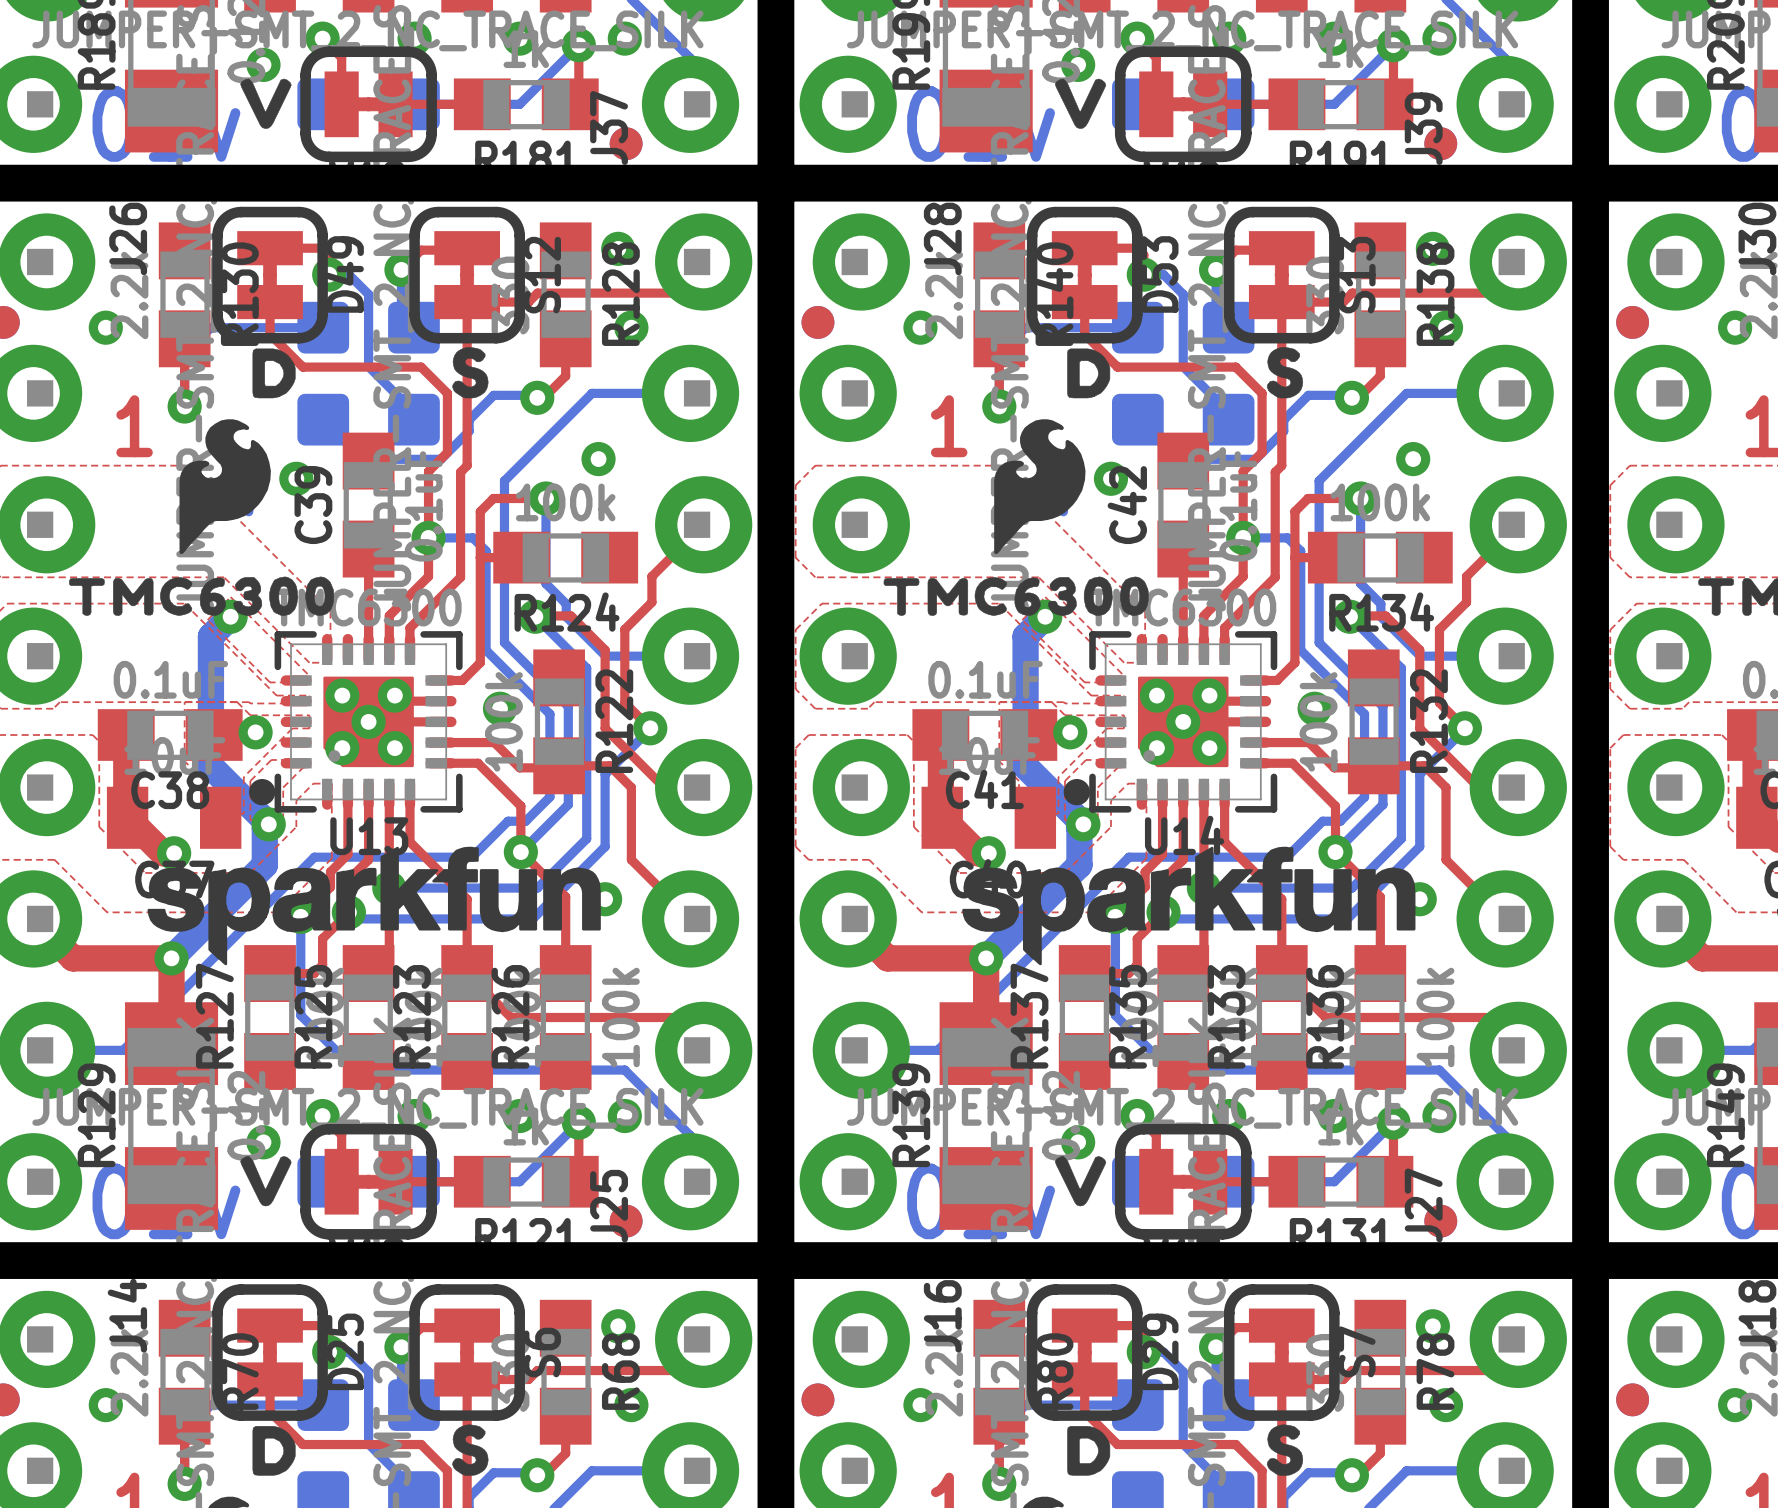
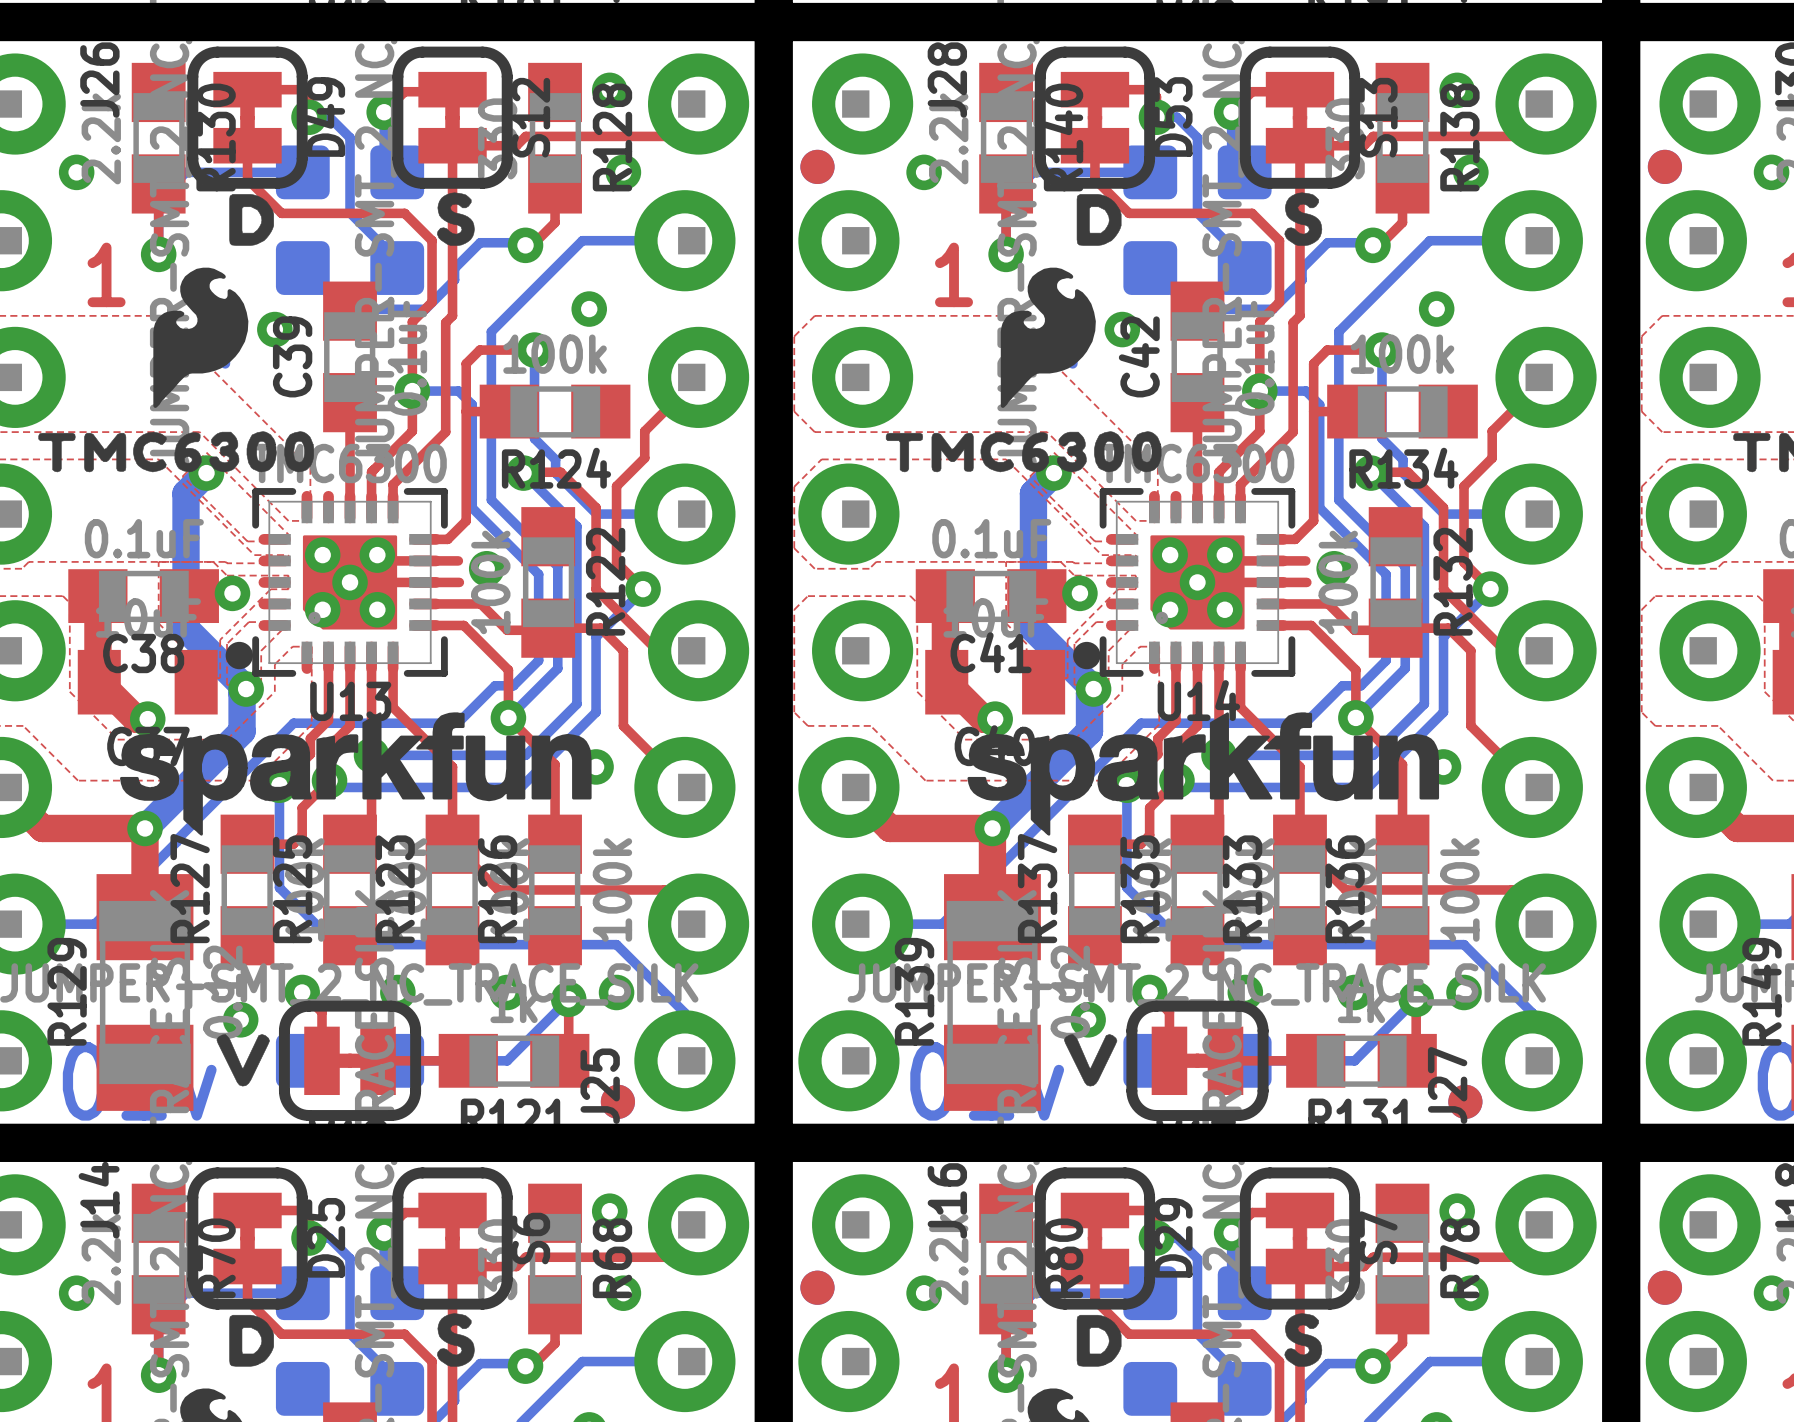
top track: none -> (425, 560) (458, 560)
top track: none -> (1272, 560) (1305, 560)
top track: none -> (425, 582) (459, 582)
top track: none -> (1272, 582) (1306, 582)

